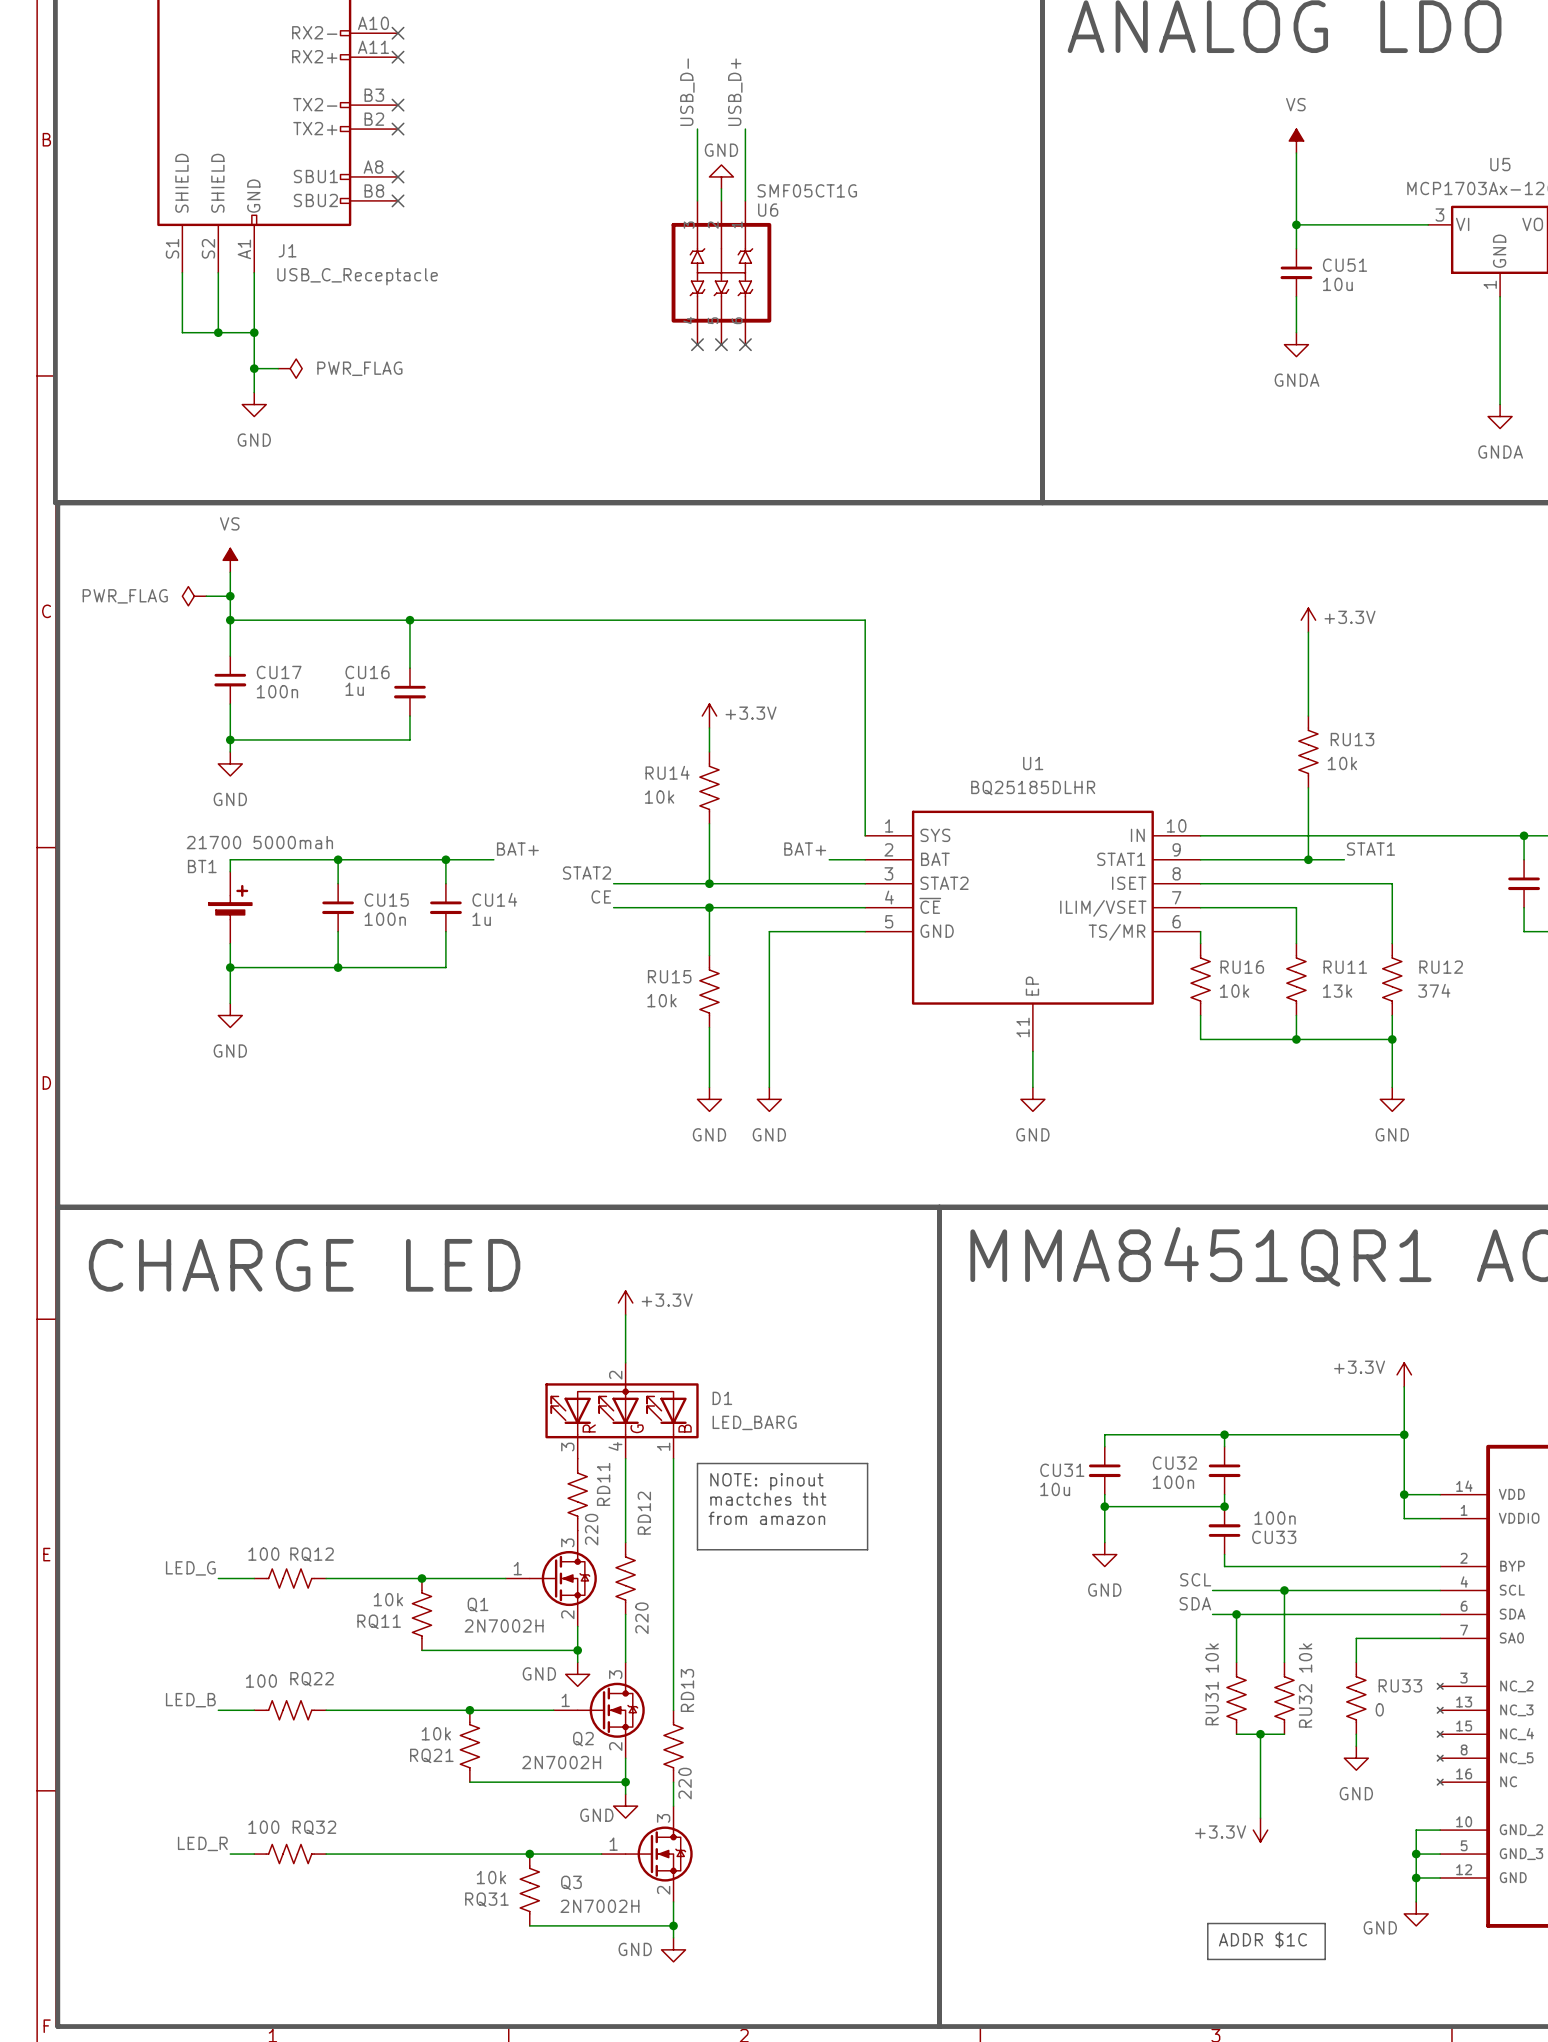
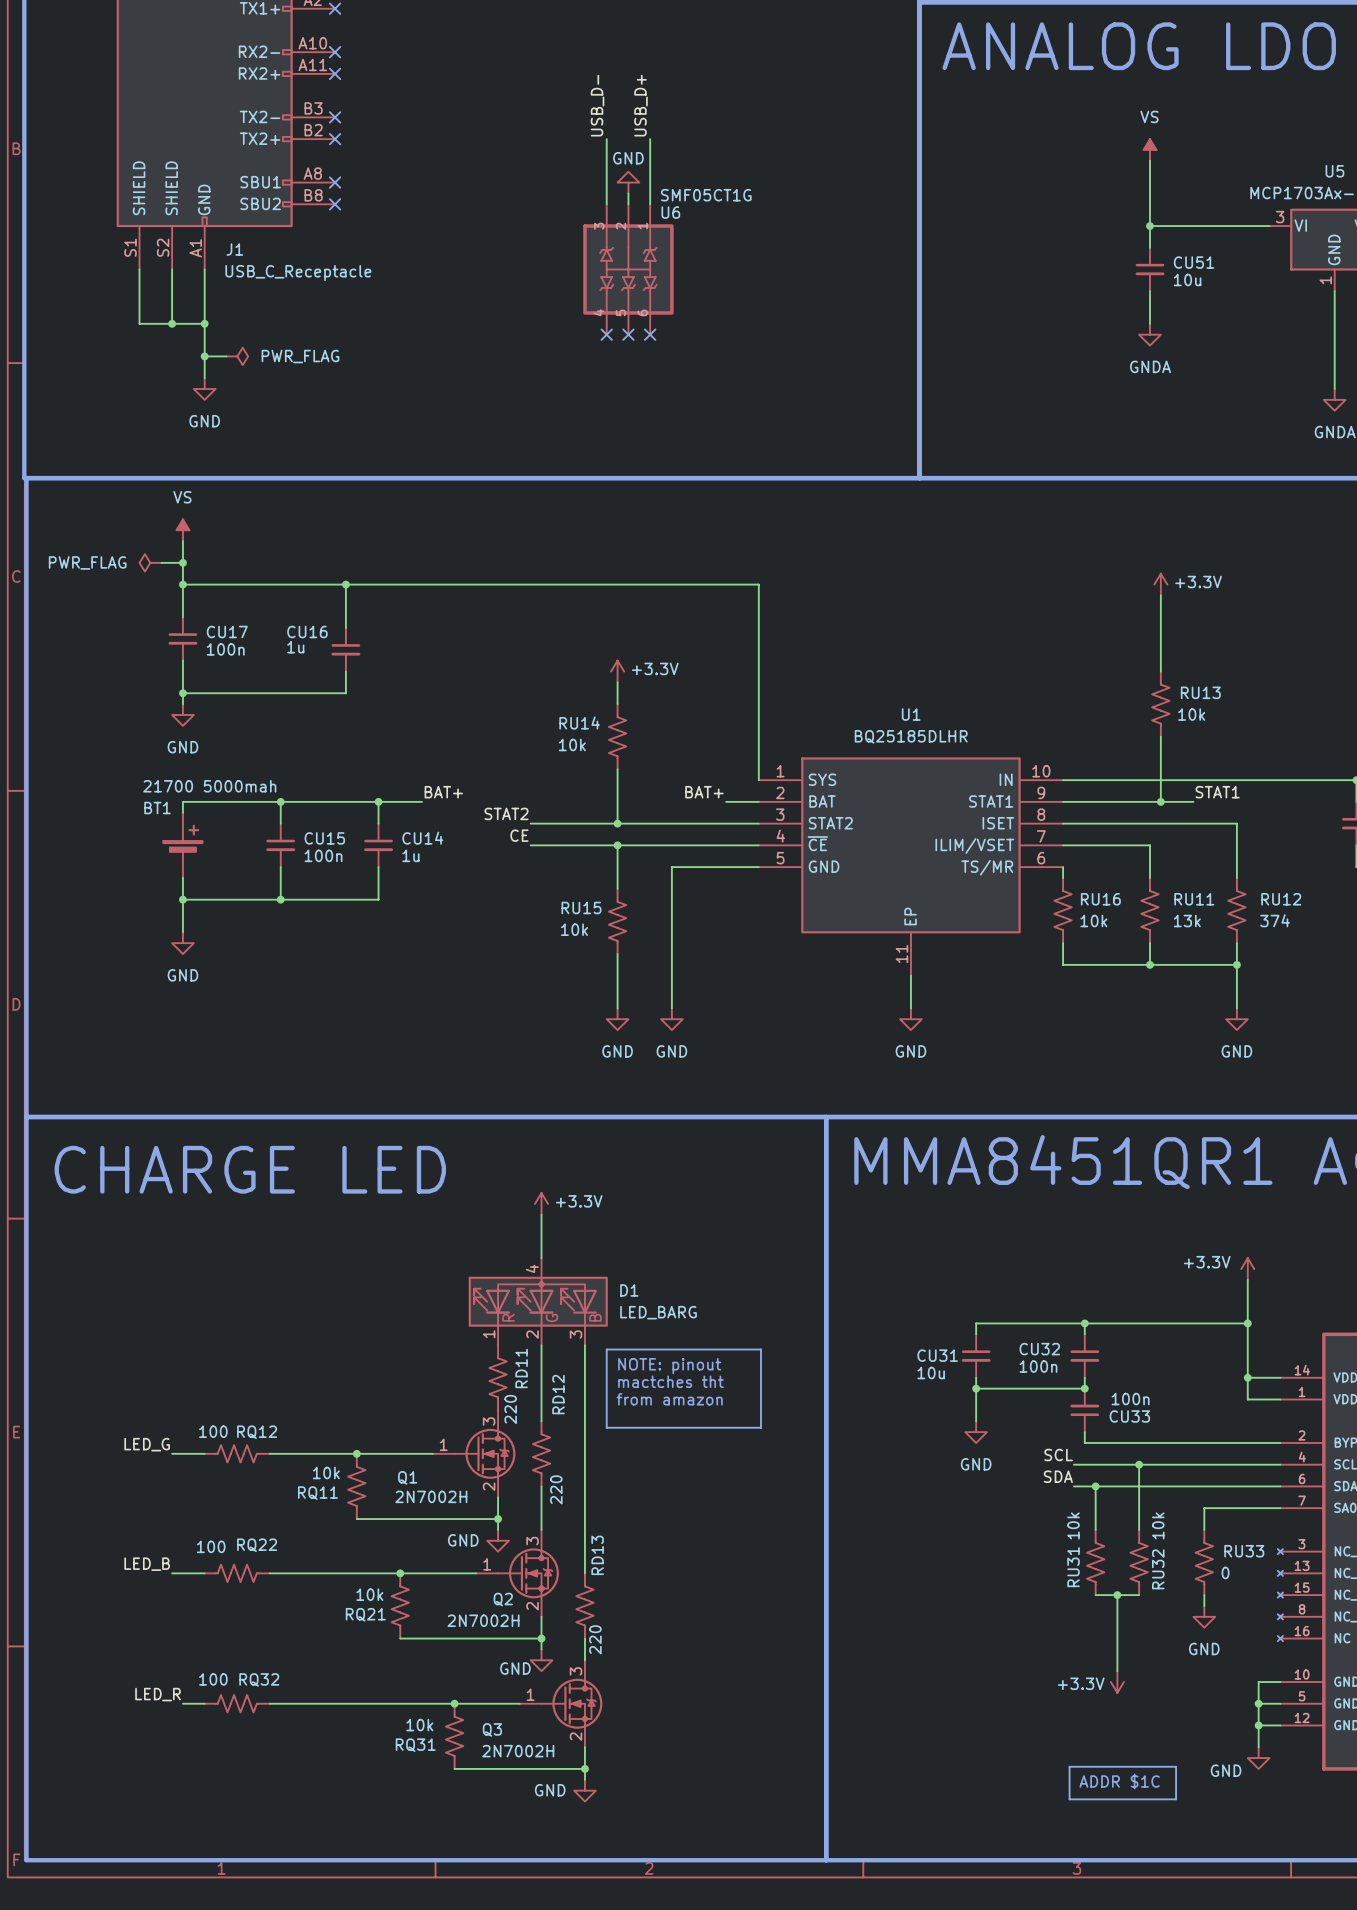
D1 pin number: 2 (615, 1375) -> 4 (532, 1268)
D1 pin number: 4 (615, 1446) -> 2 (532, 1334)
D1 pin number: 1 (663, 1446) -> 3 (576, 1334)
D1 pin number: 3 (567, 1447) -> 1 (489, 1334)

